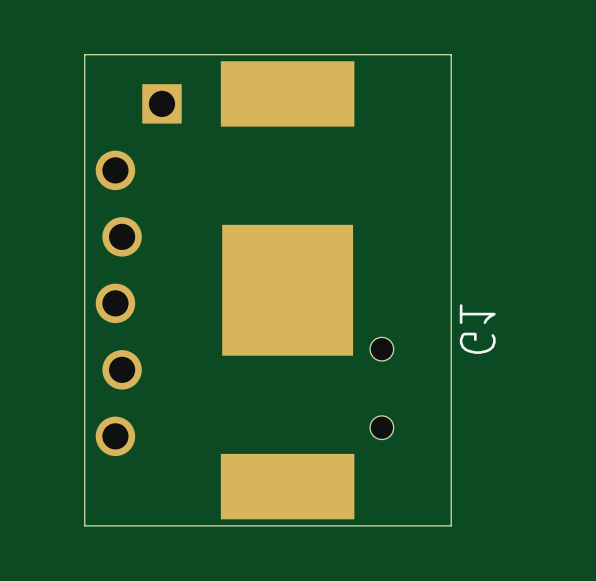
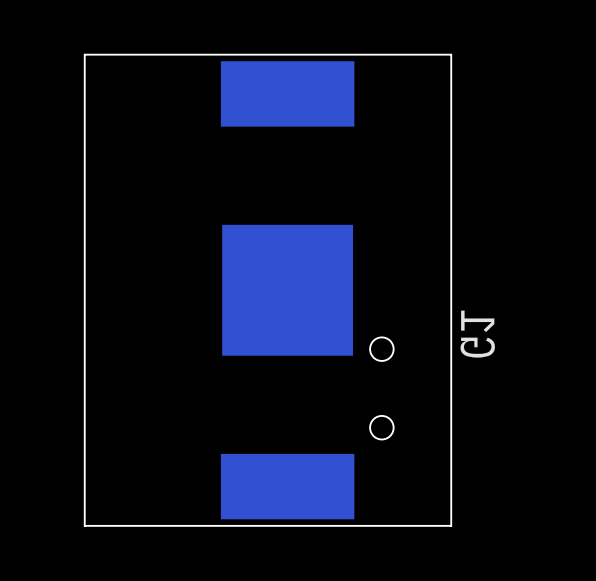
part: (138, 270) -> none

